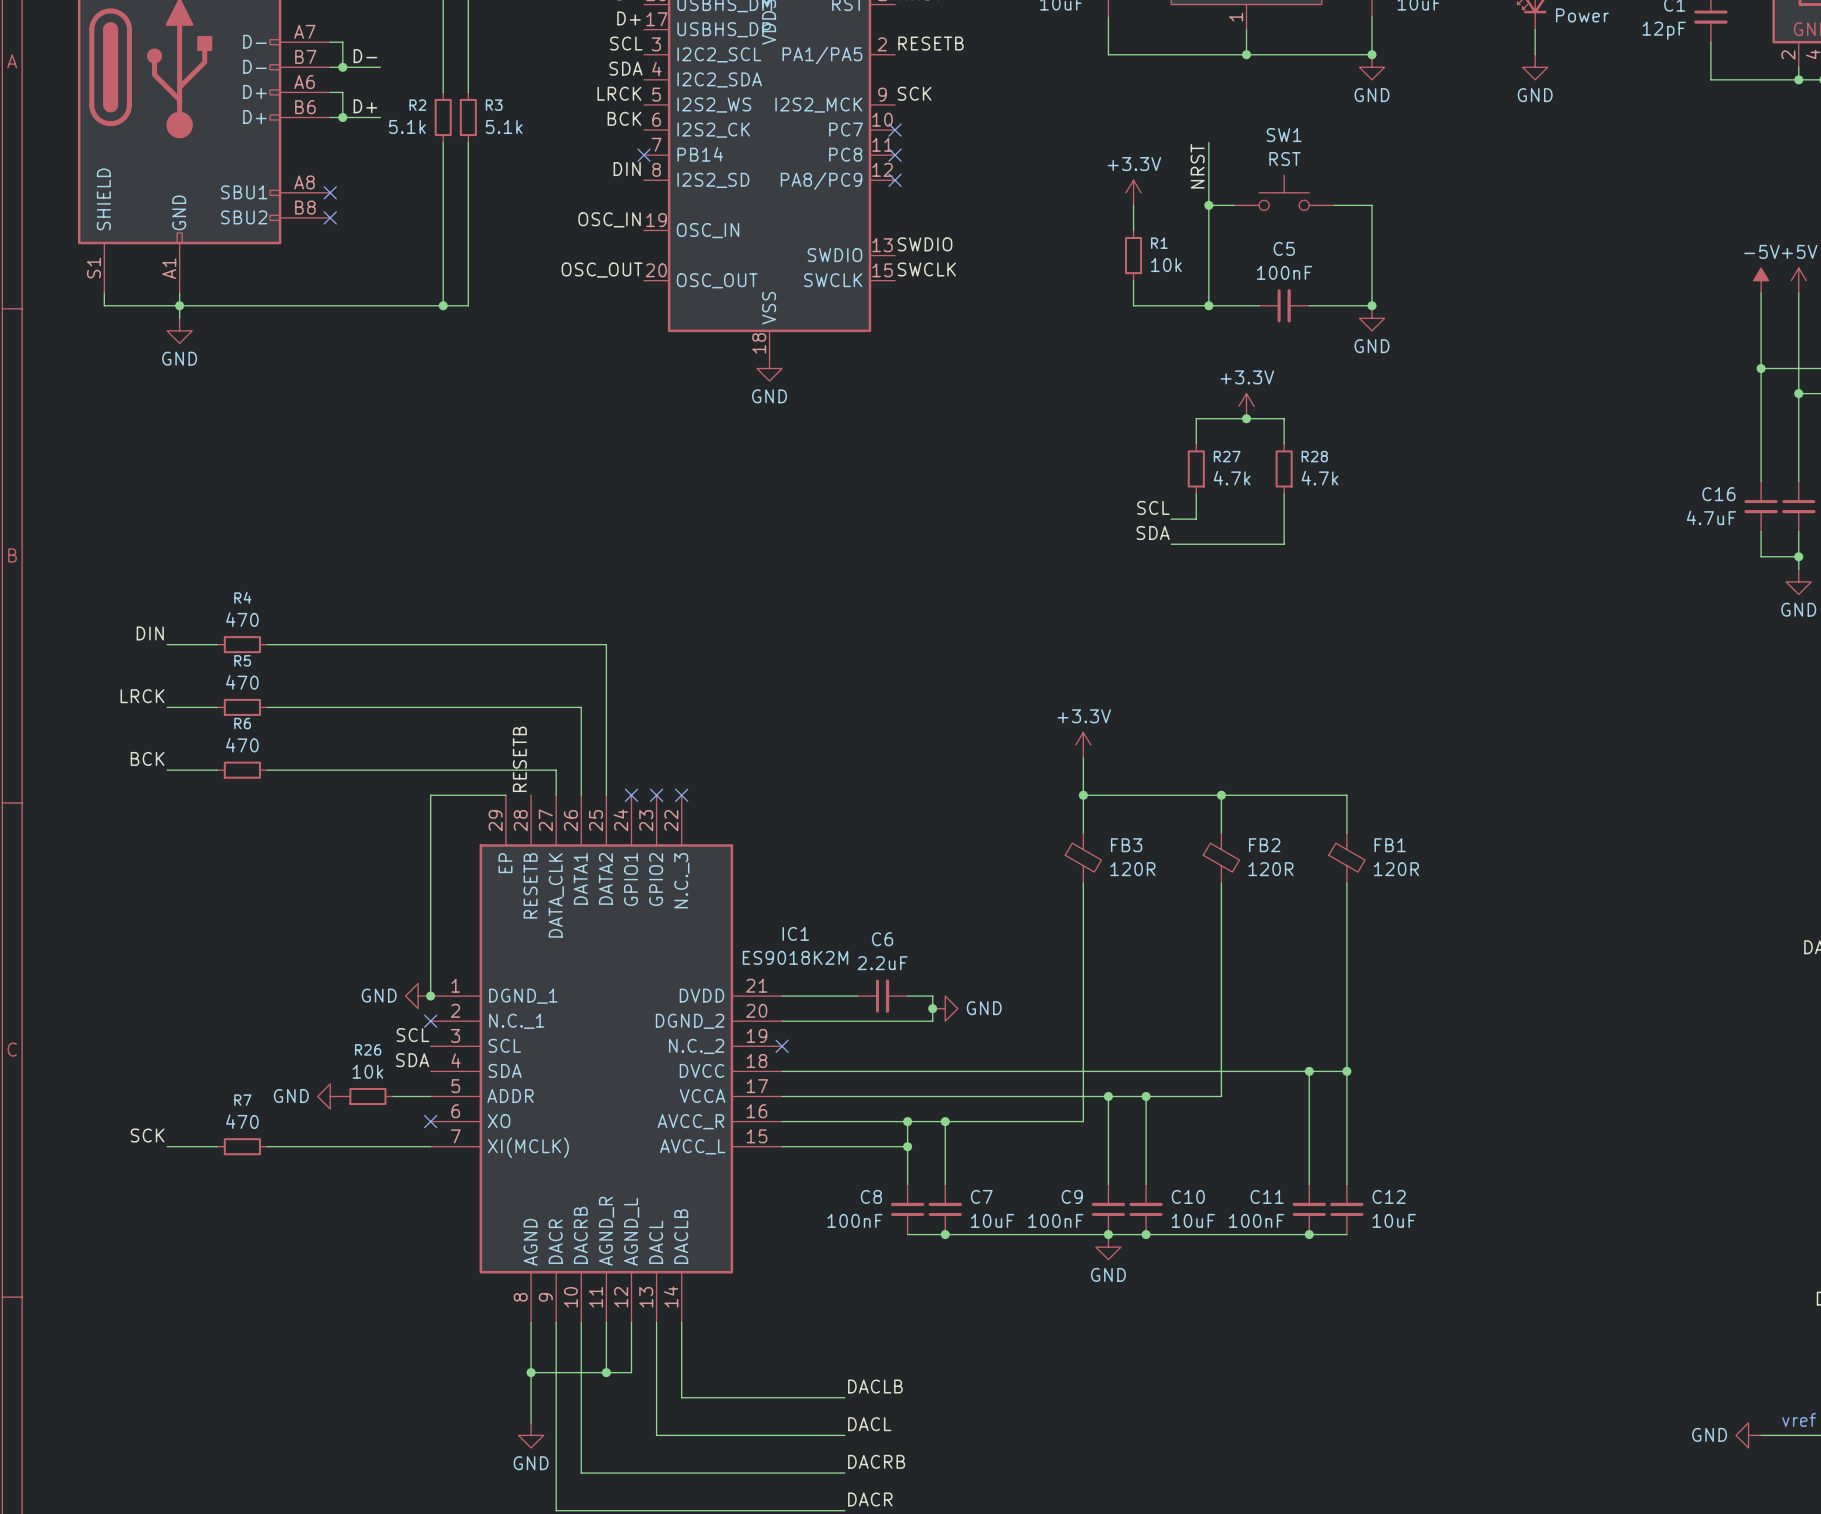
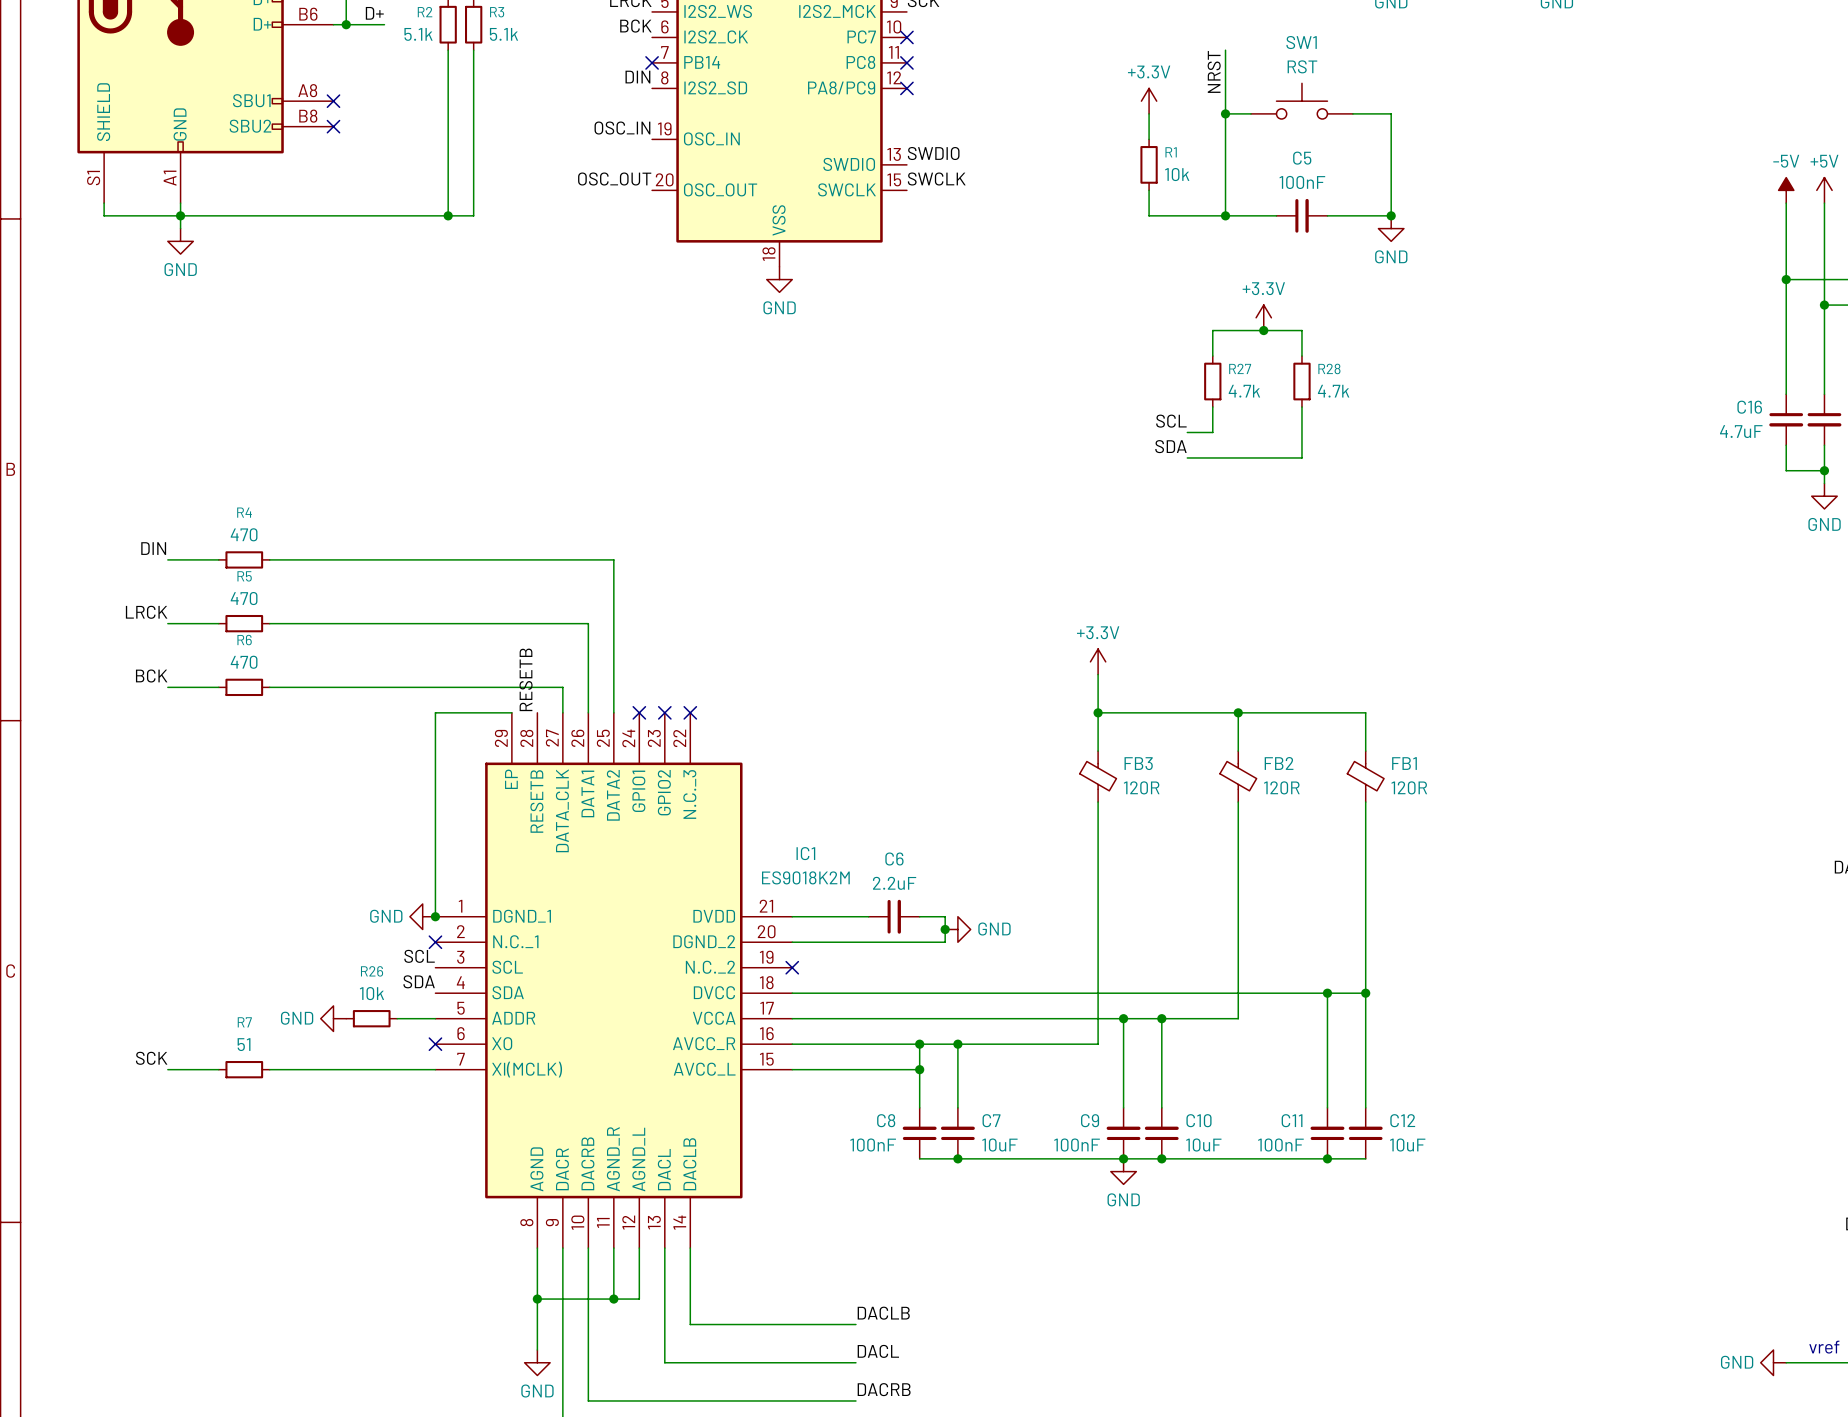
R7 value: 470 (242, 1121) -> 51 (244, 1044)

